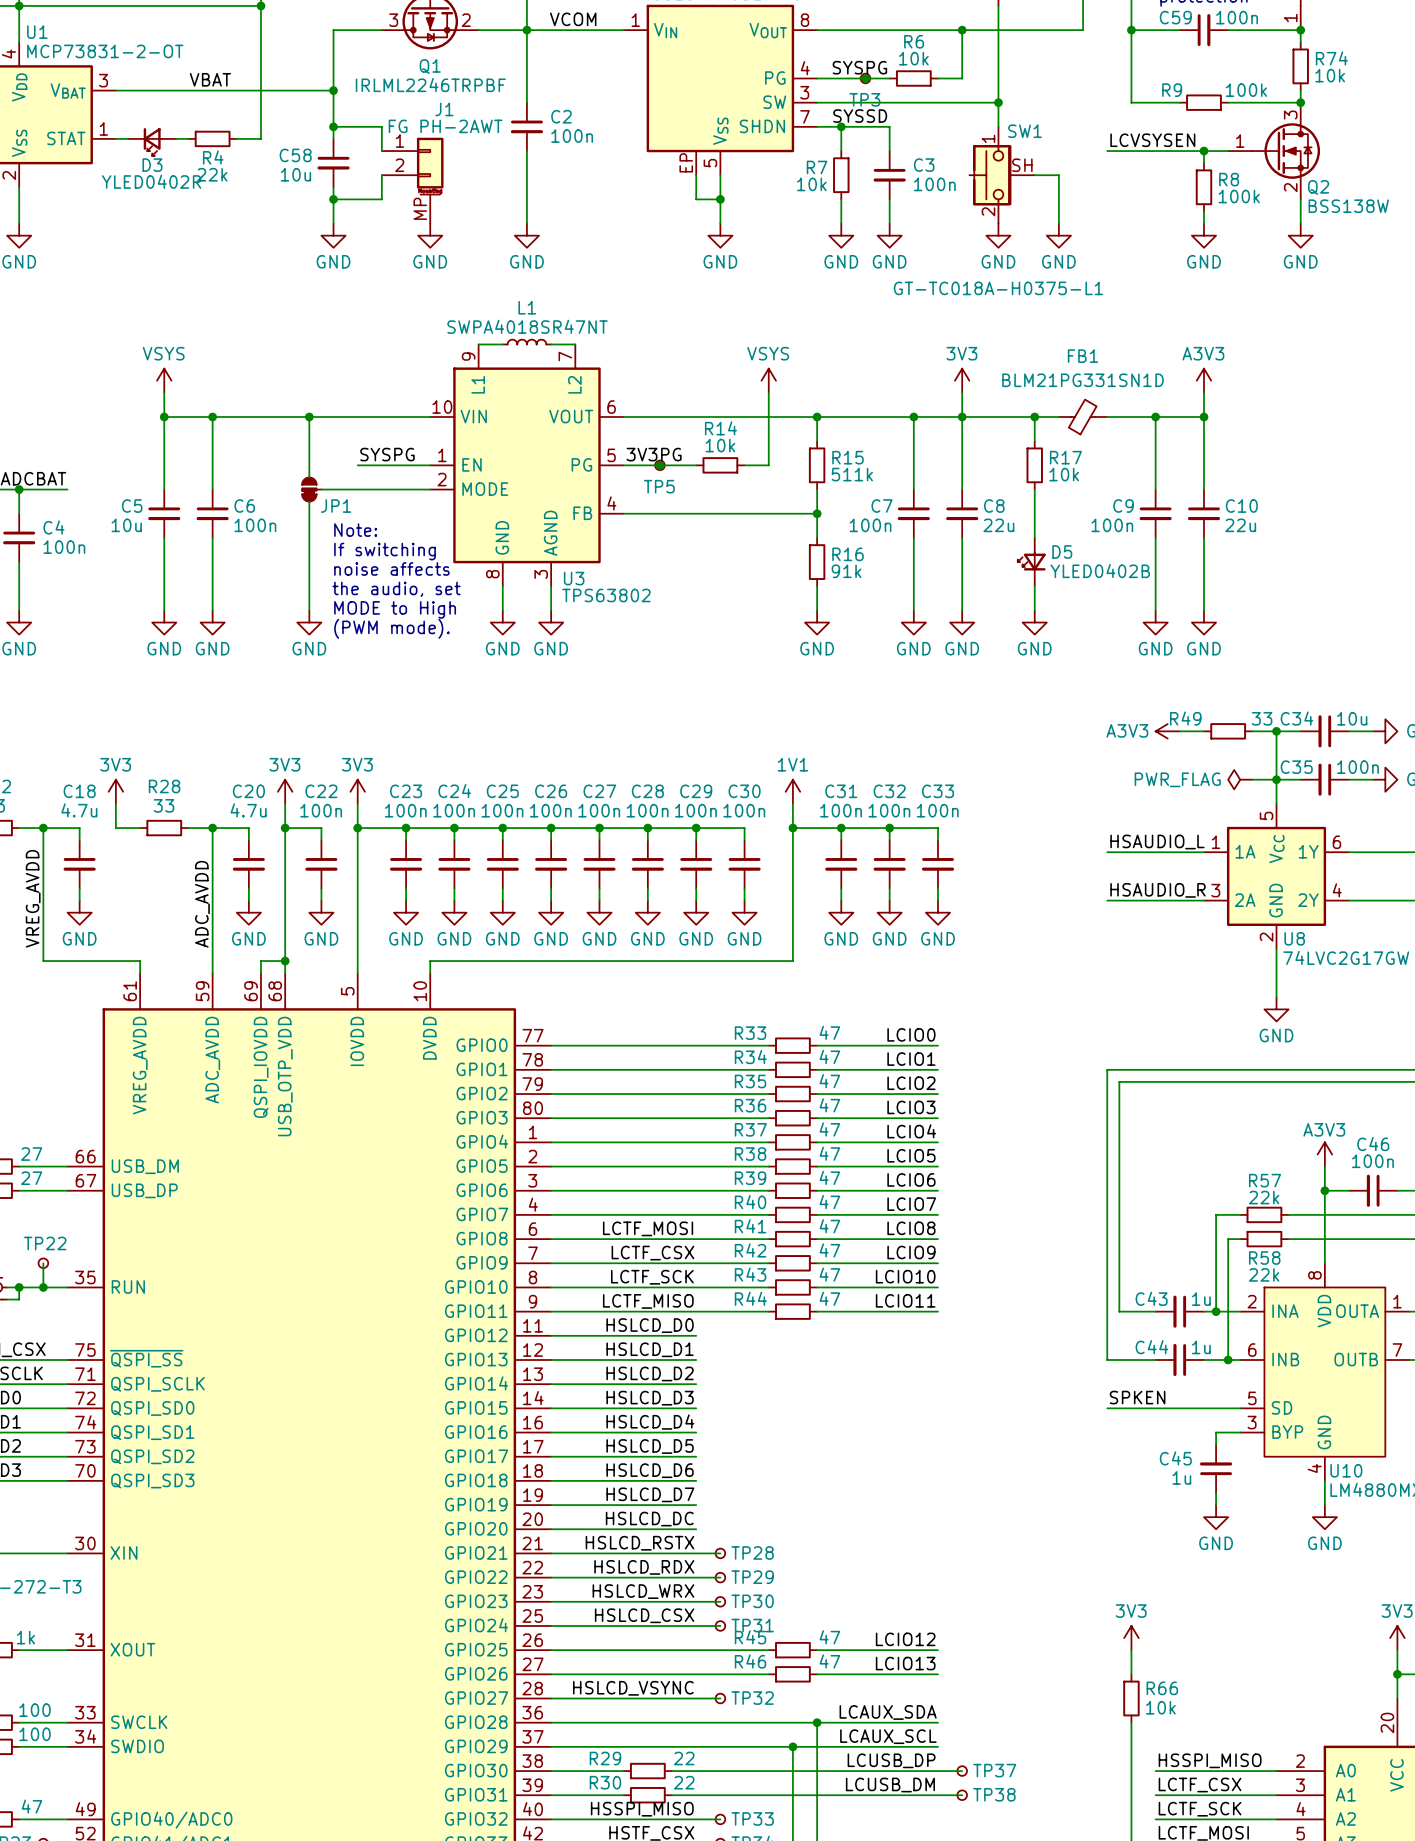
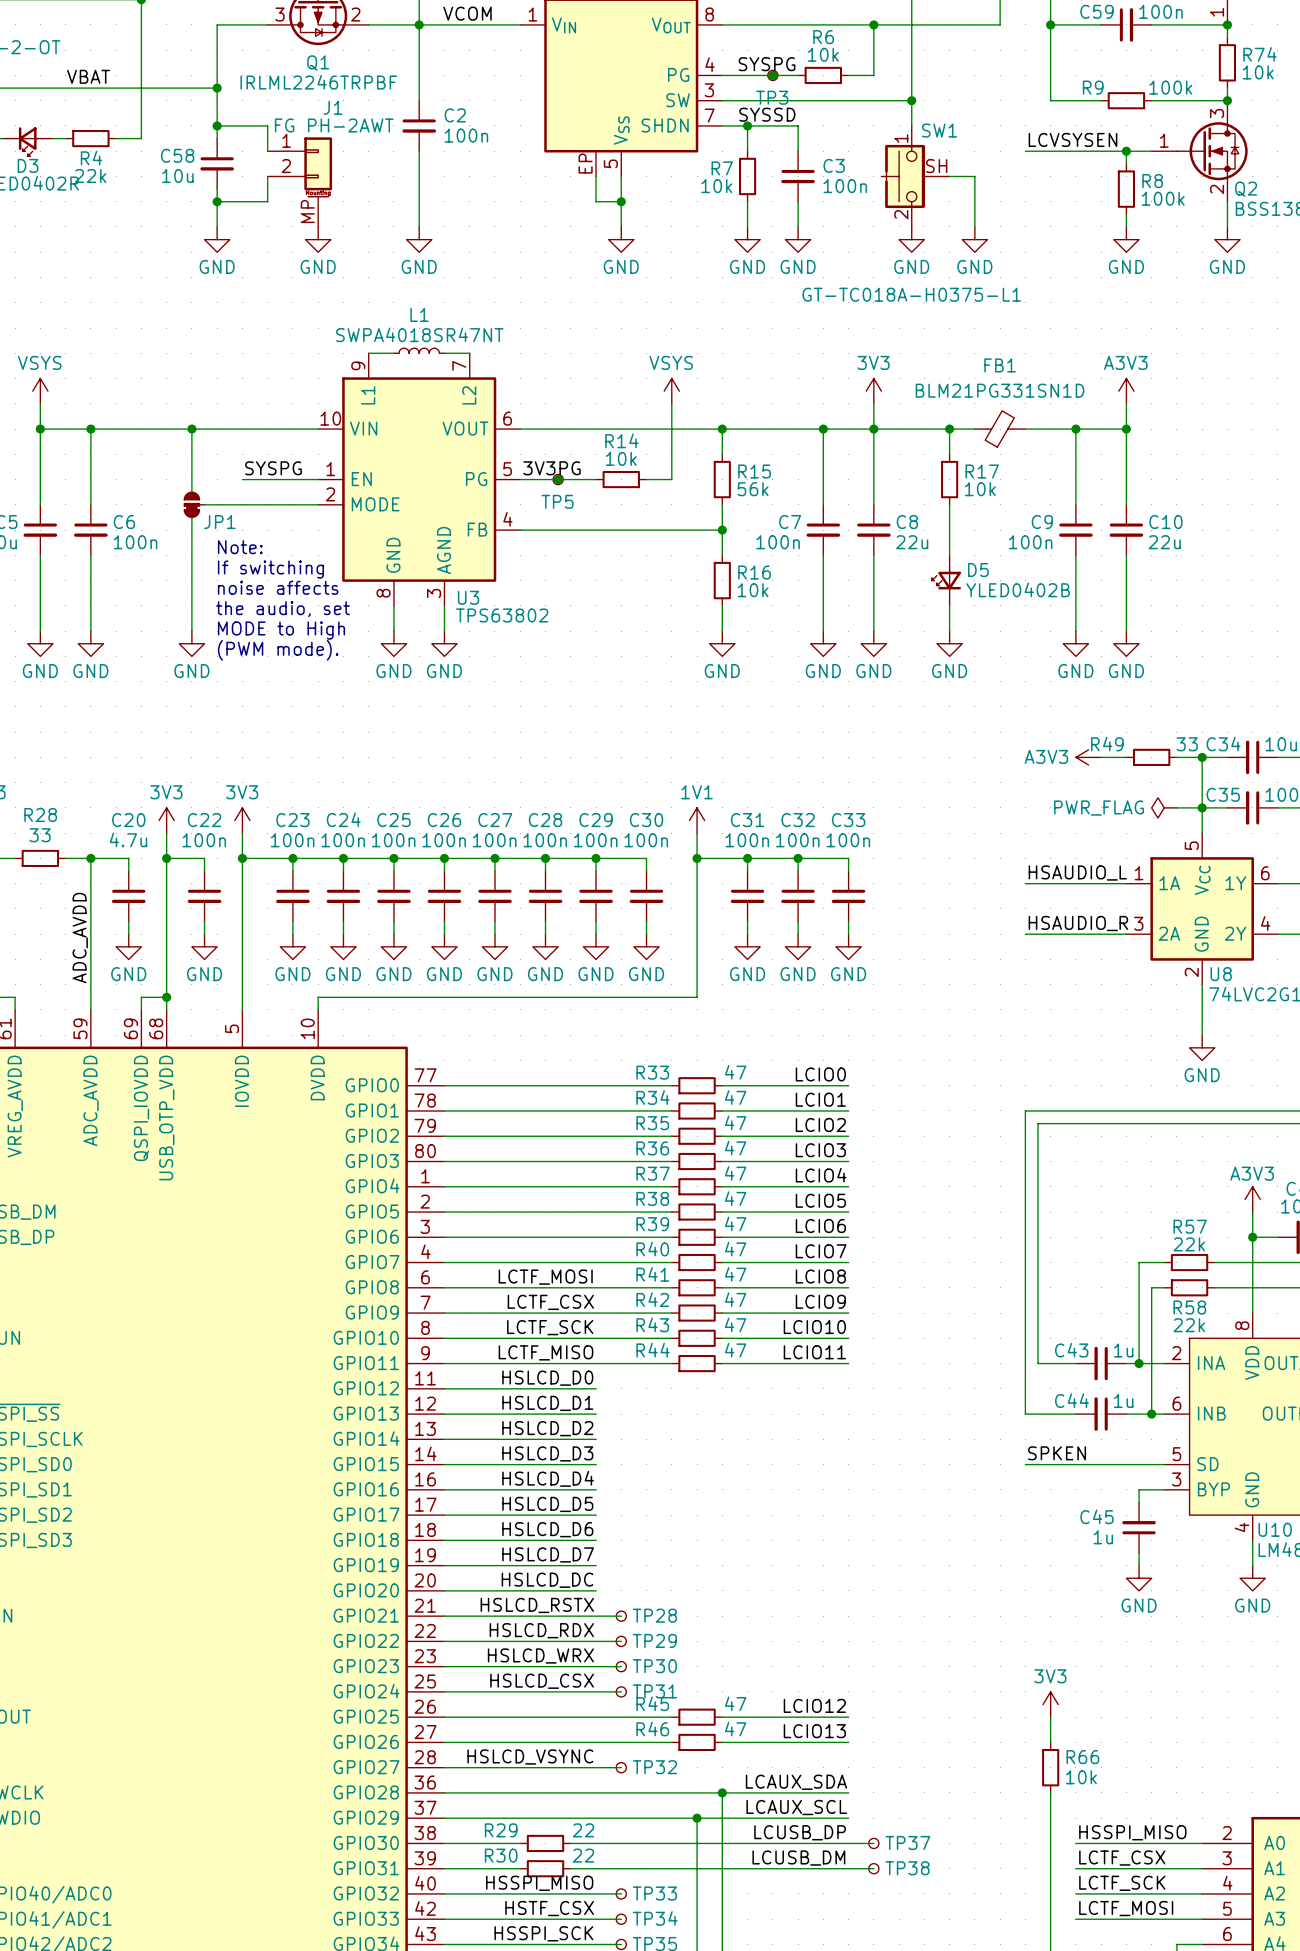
R15 value: 511k (852, 474) -> 56k (753, 489)
R16 value: 91k (846, 571) -> 10k (753, 590)

